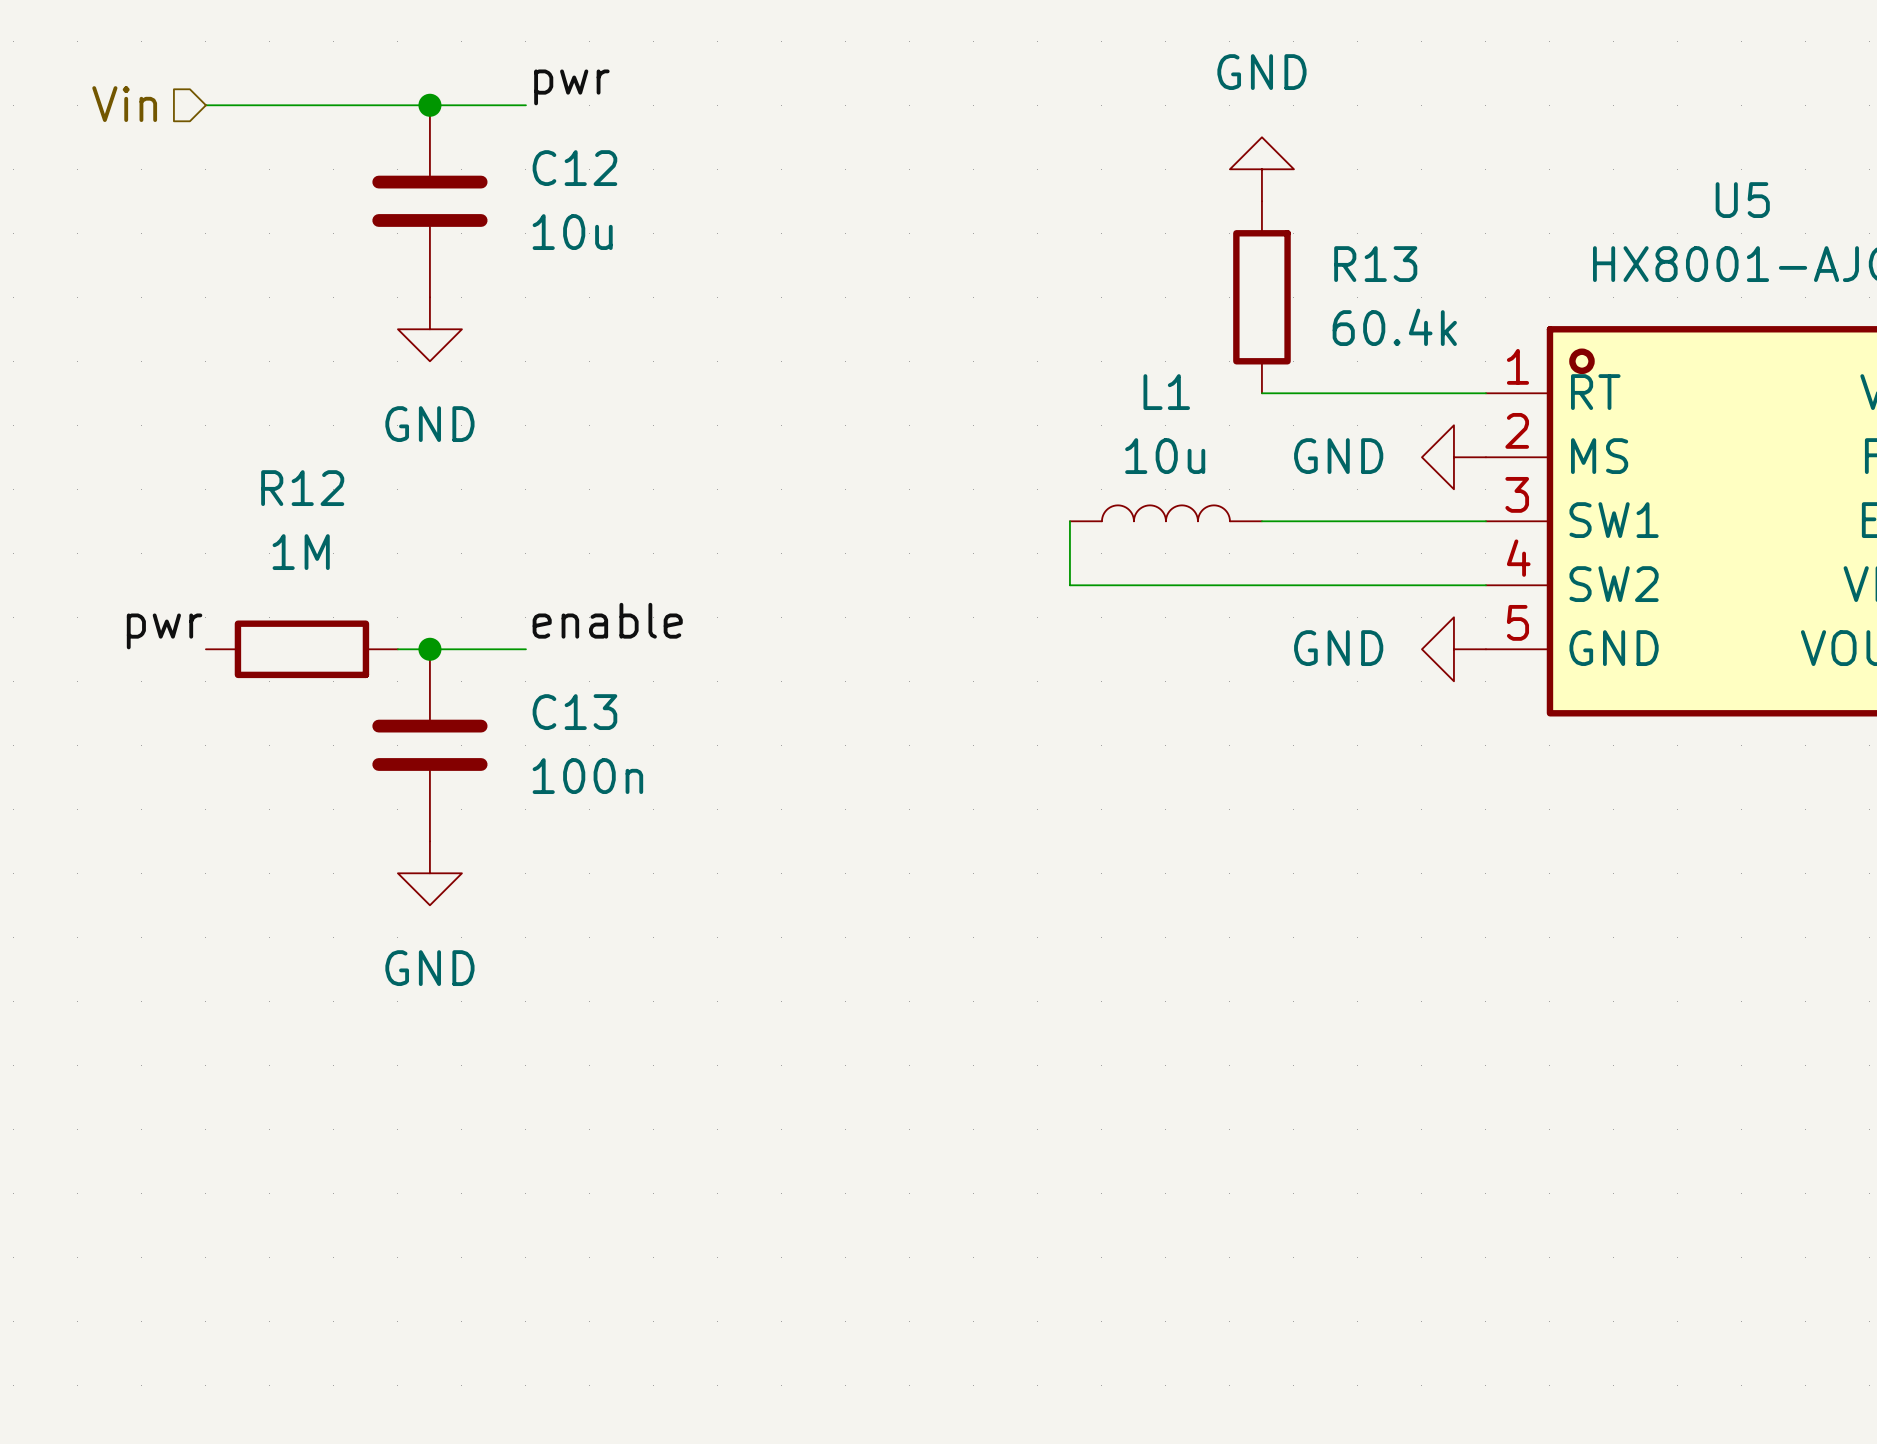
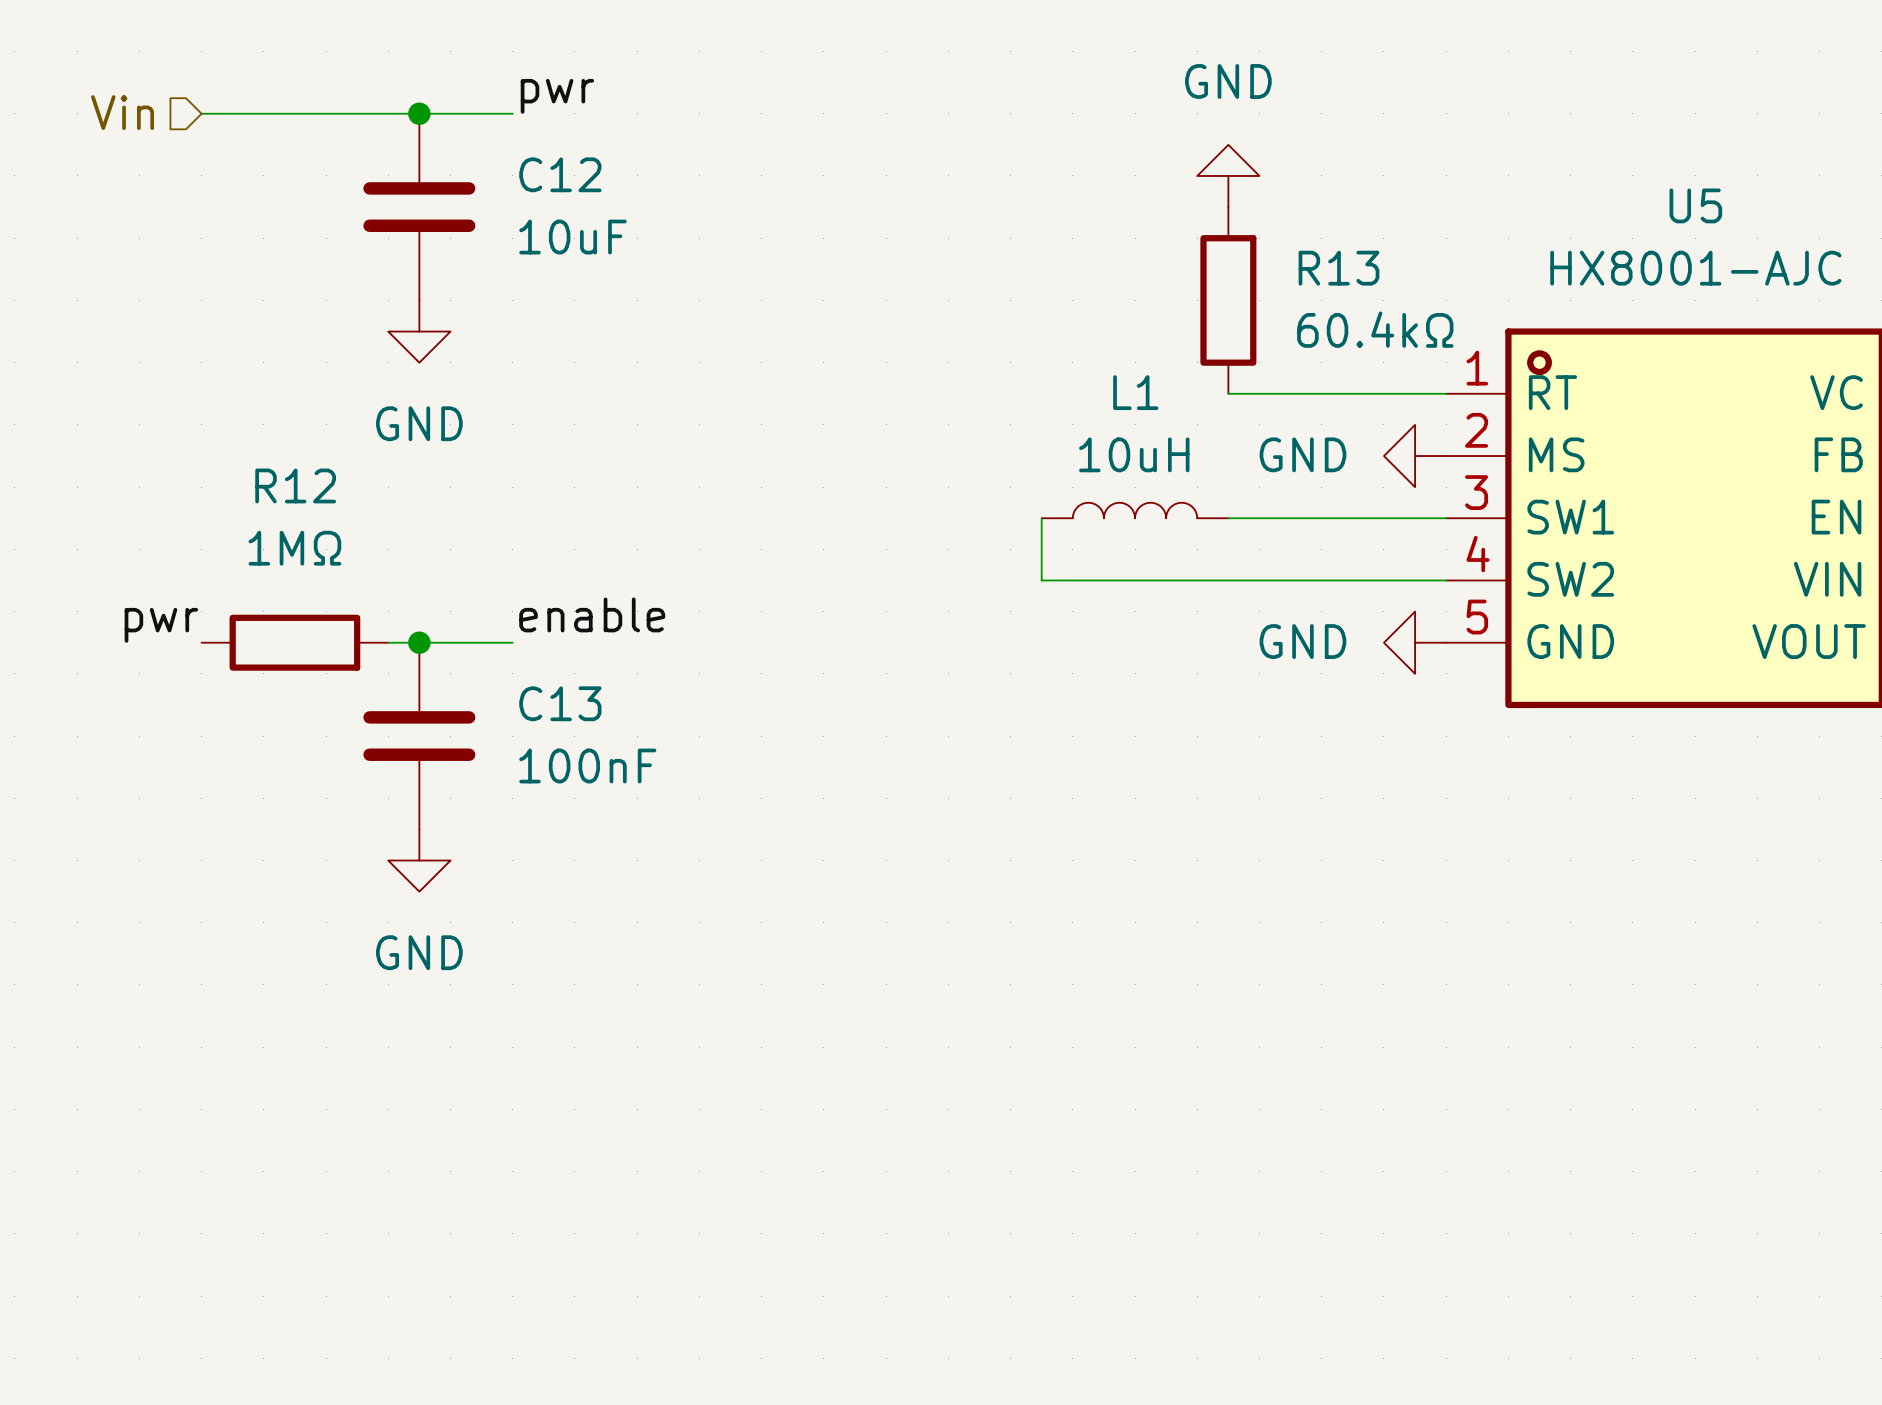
C12 value: 10u (572, 232) -> 10uF (572, 237)
R13 value: 60.4k (1394, 327) -> 60.4kΩ (1375, 329)
L1 value: 10u (1165, 456) -> 10uH (1134, 454)
R12 value: 1M (301, 552) -> 1MΩ (294, 548)
C13 value: 100n (587, 776) -> 100nF (587, 766)

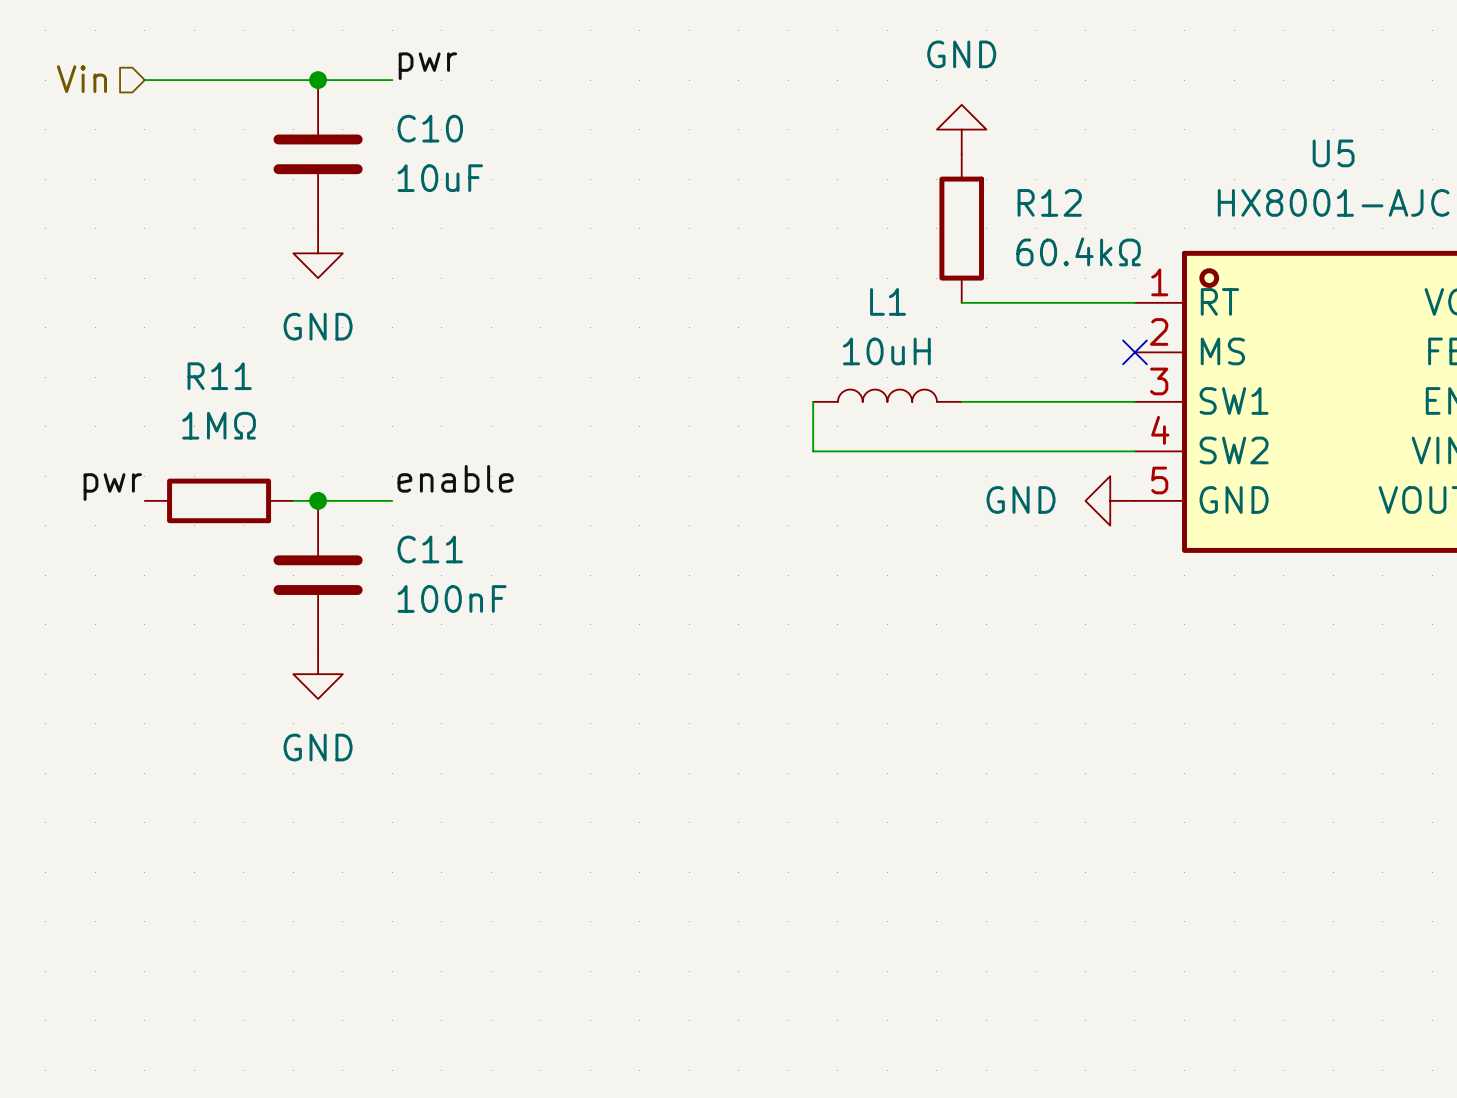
C12 name: C12 (560, 174) -> C10 (430, 128)
R13 name: R13 (1339, 268) -> R12 (1049, 202)
power symbol: GND (1415, 456) -> none
no-connect mark: none -> (1134, 352)
R12 name: R12 (295, 485) -> R11 (219, 376)
C13 name: C13 (560, 703) -> C11 (430, 549)

